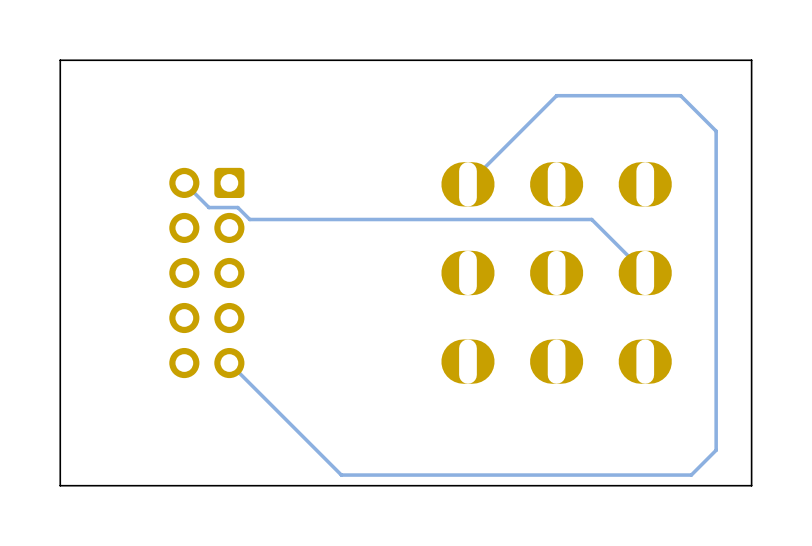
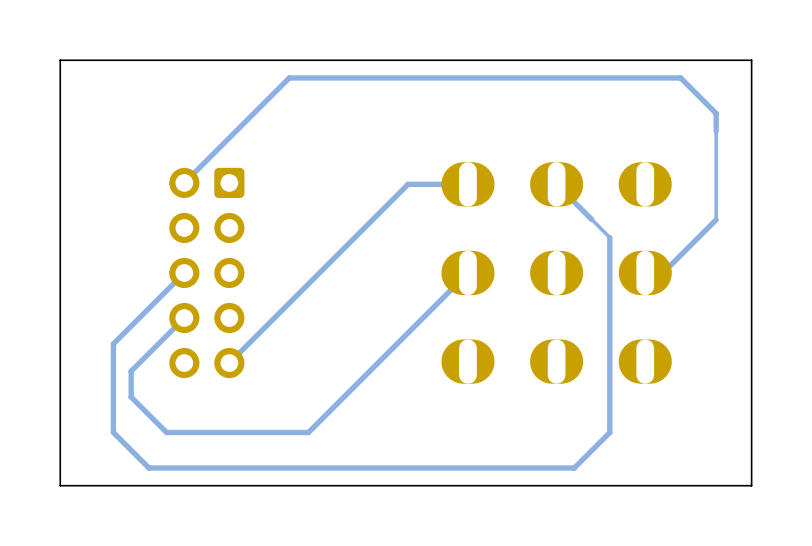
track: (716, 131) (680, 95) (556, 95) (467, 184) -> none
track: (184, 182) (208, 207) (237, 207) (249, 219) (591, 219) -> (184, 182) (289, 77) (680, 77) (716, 113) (716, 131)
track: none -> (556, 184) (591, 219)
track: (716, 219) (716, 450) (691, 475) (341, 475) (229, 363) -> (467, 184) (408, 184) (229, 363)
track: (609, 237) (645, 272) -> (716, 219) (662, 272) (645, 272)
track: none -> (609, 237) (609, 432) (574, 467) (148, 467) (113, 432) (113, 343) (184, 272)
track: none -> (467, 272) (308, 432) (166, 432) (131, 397) (131, 371) (184, 318)

